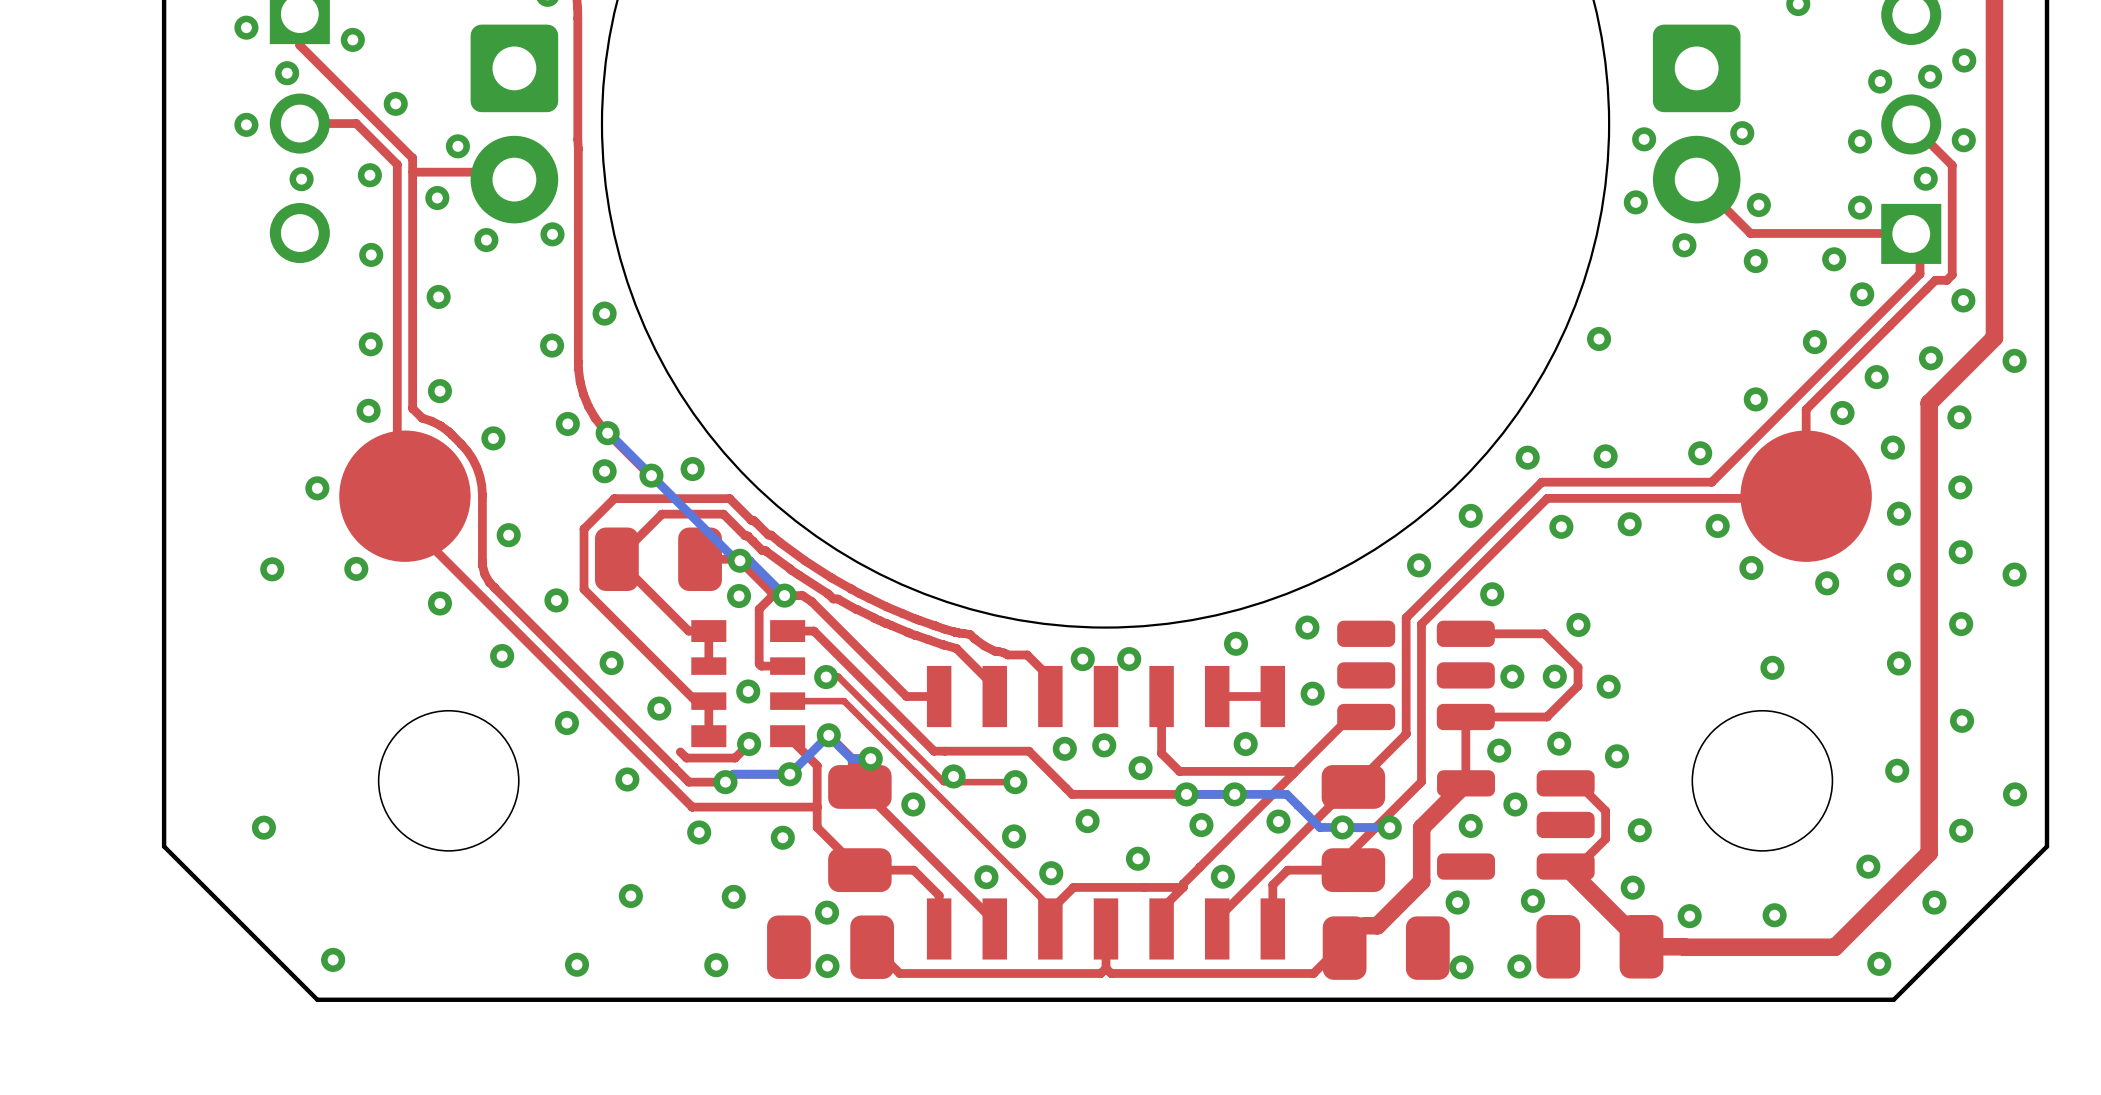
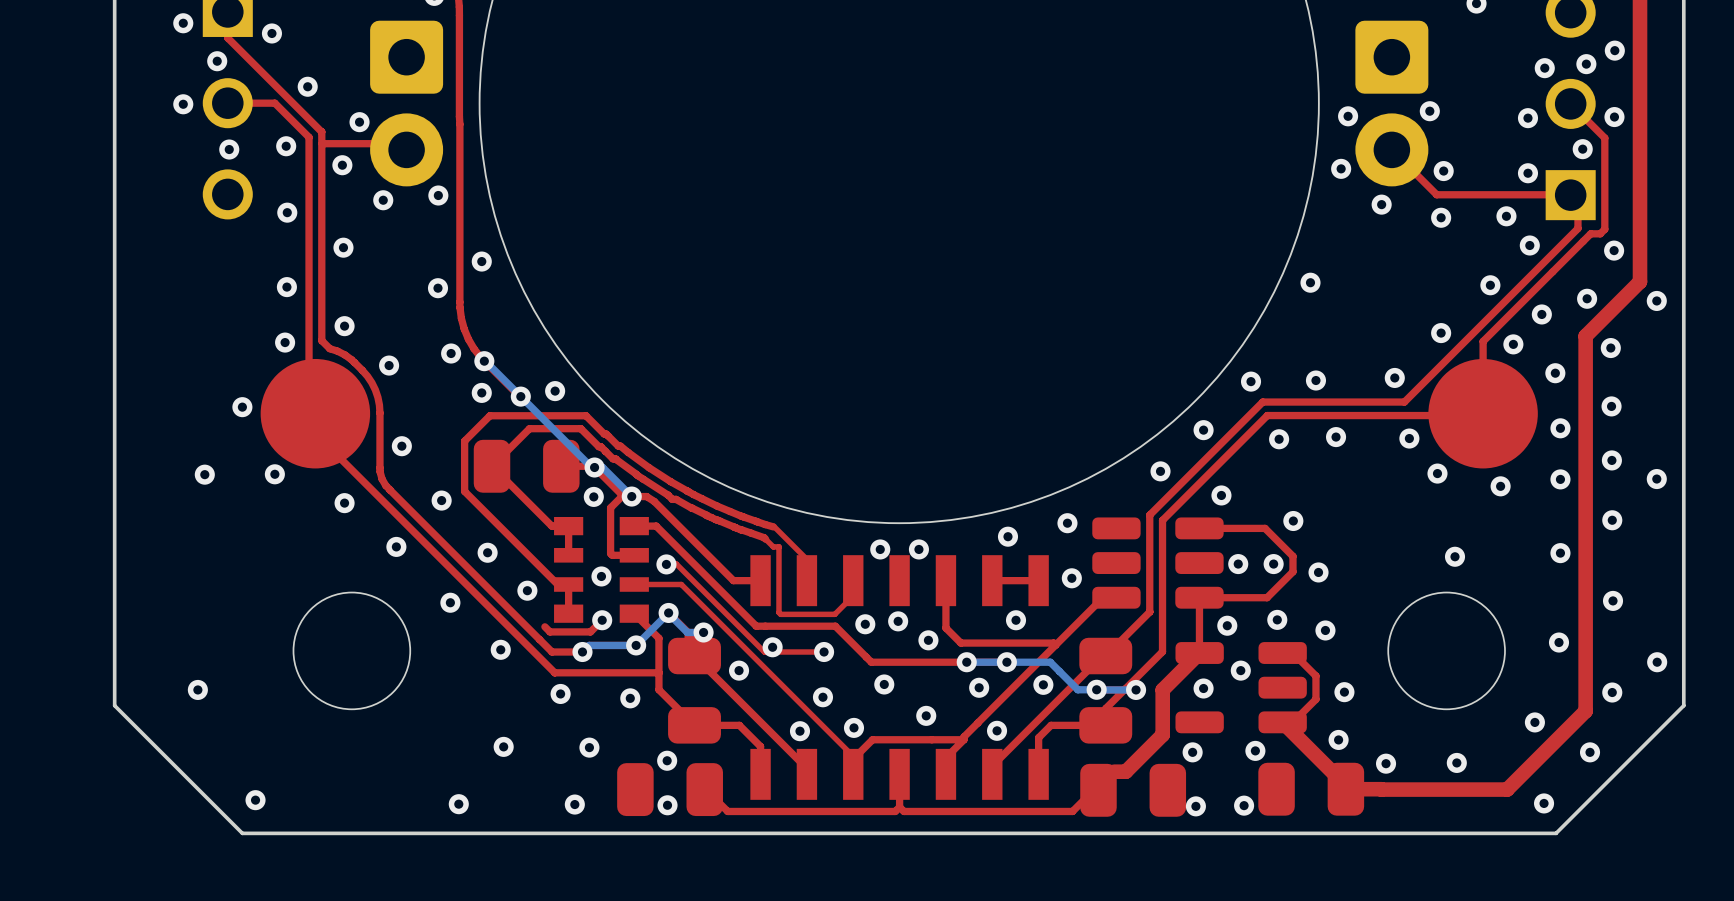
top track: (955, 632) (970, 634) (994, 651) (1007, 654) (1027, 654) (1050, 678) (1050, 696) -> (773, 526) (806, 559)
top track: (943, 644) (956, 648) (987, 679) (992, 687) (994, 696) -> (764, 537) (773, 546) (778, 546) (778, 612) (780, 614) (834, 614) (853, 595)

